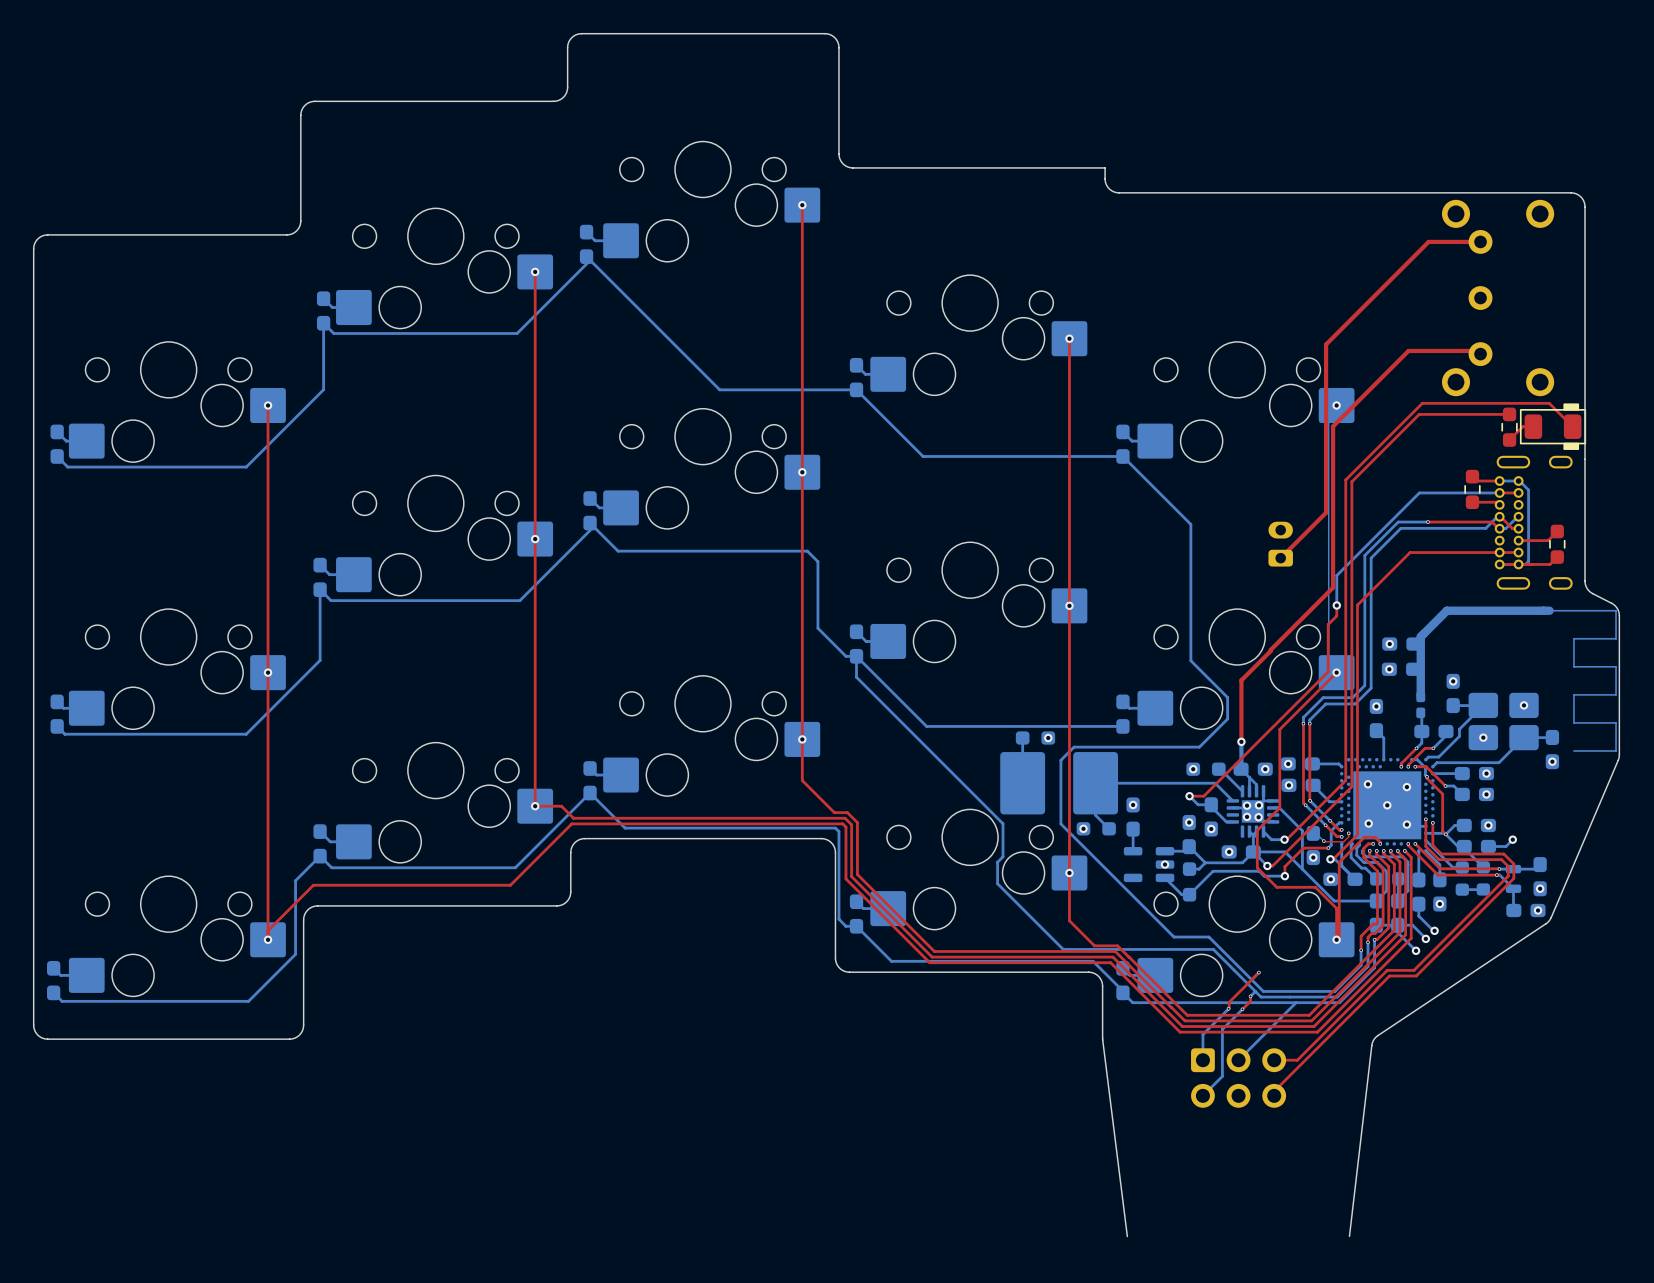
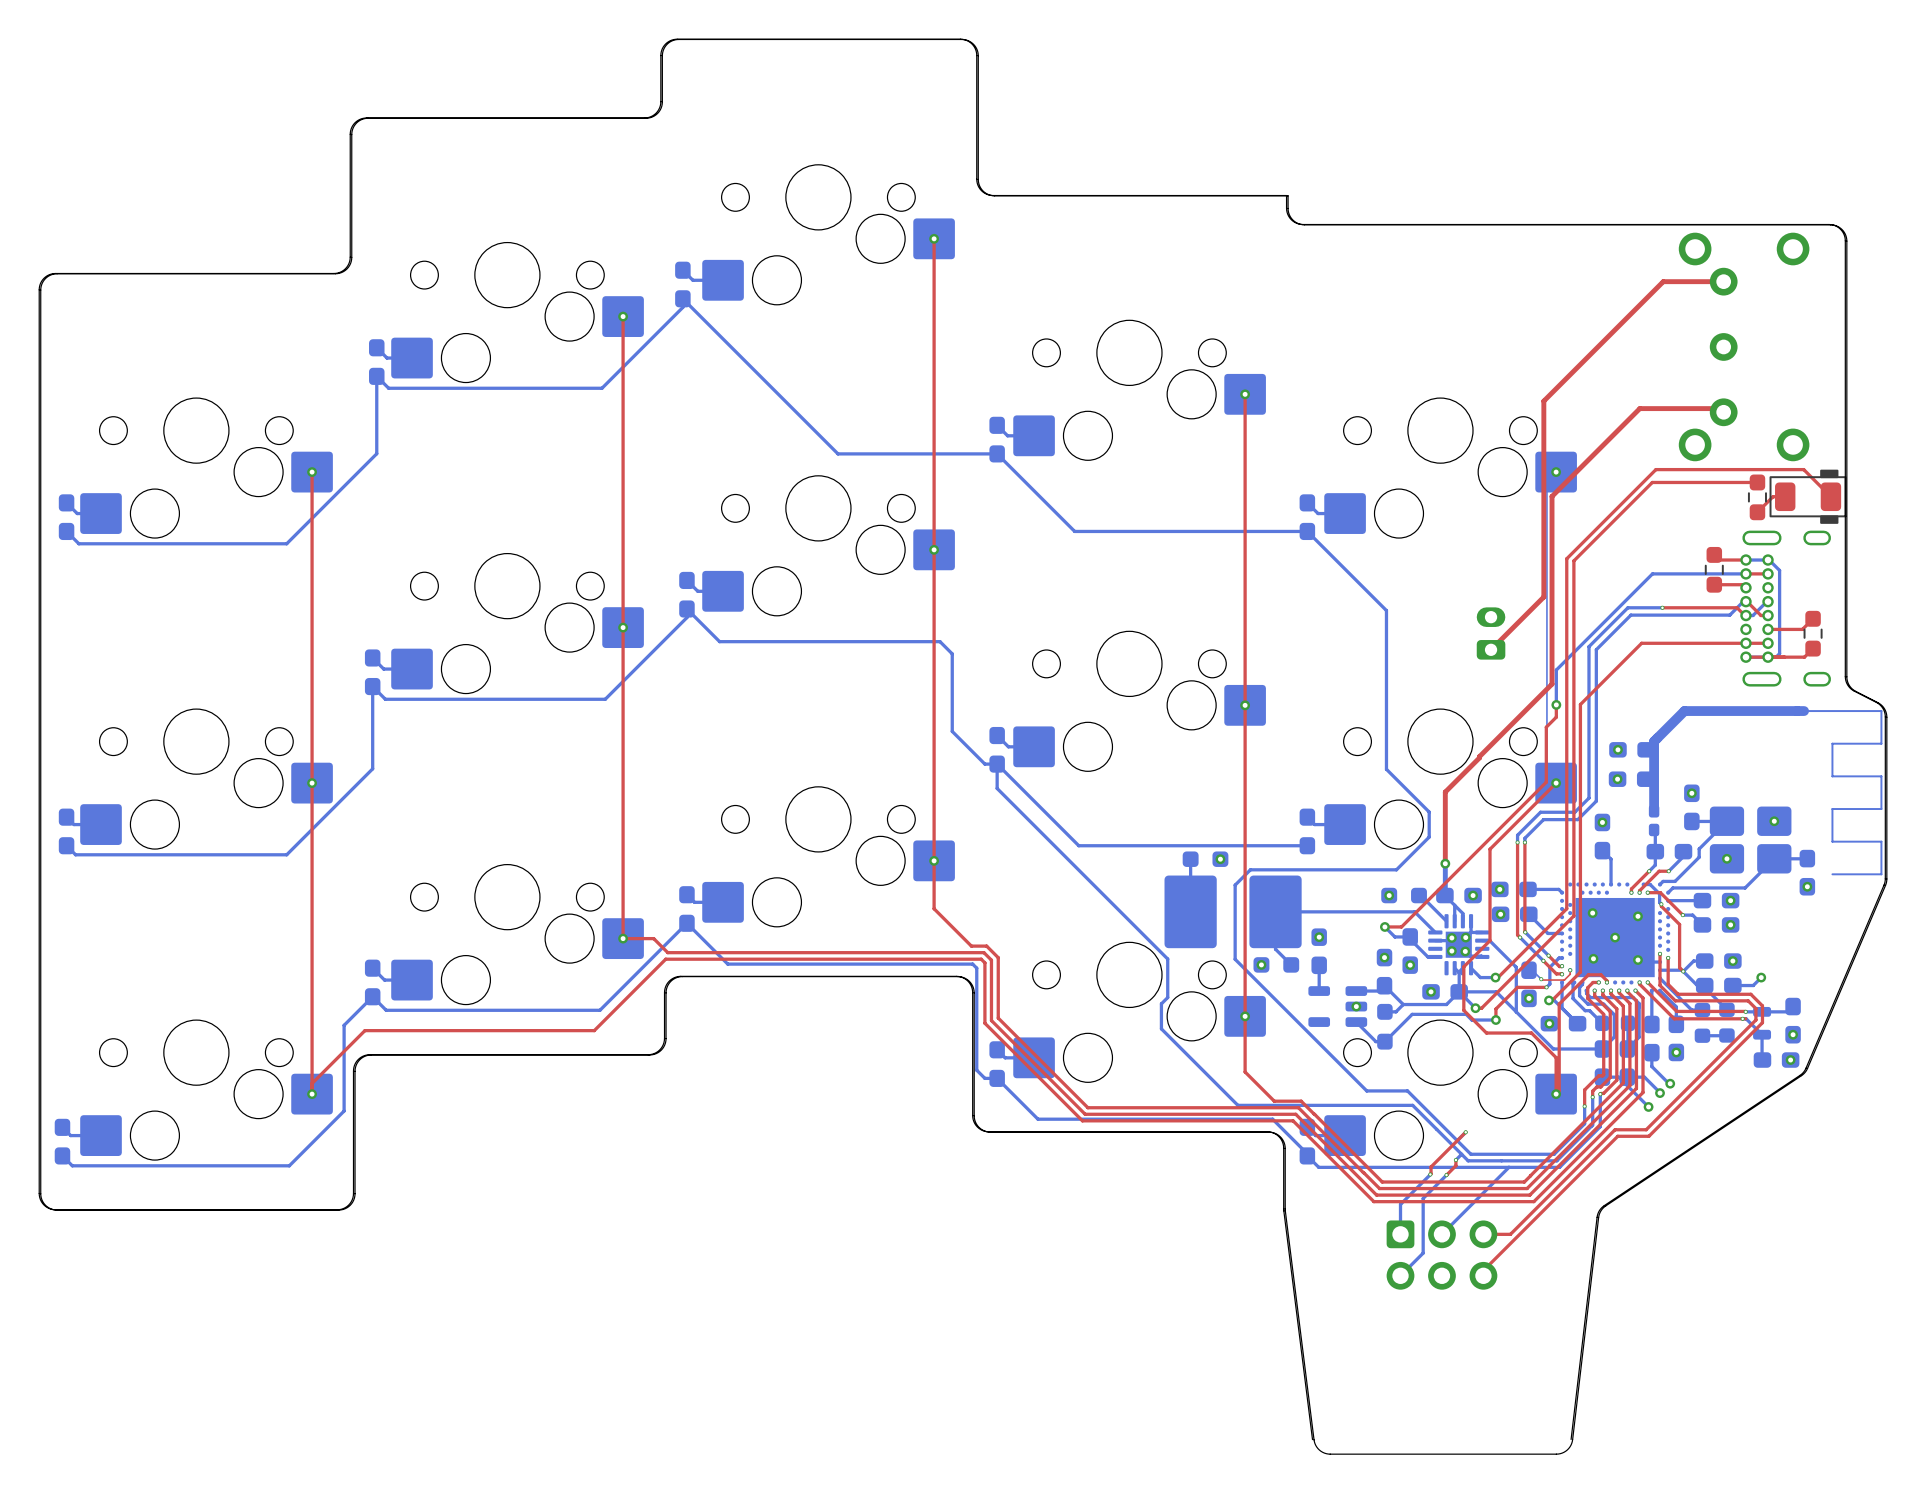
board edge: none -> (678, 39) (961, 39) (969, 41) (974, 45) (978, 53) (978, 181) (983, 191) (992, 195) (1288, 195) (1290, 216) (1296, 222) (1304, 224) (1830, 224) (1839, 227) (1844, 232) (1846, 241) (1846, 678) (1852, 689) (1879, 703) (1886, 713) (1886, 882) (1805, 1072) (1600, 1210) (1572, 1439) (1565, 1451) (1556, 1454) (1330, 1454) (1319, 1450) (1314, 1439) (1285, 1211) (1285, 1148) (1281, 1138) (1275, 1133) (1268, 1132) (990, 1132) (982, 1129) (976, 1123) (974, 1115) (974, 991) (969, 981) (959, 976) (680, 976) (672, 980) (666, 987) (665, 1040) (662, 1048) (653, 1054) (365, 1055) (358, 1061) (355, 1069) (354, 1195) (350, 1205) (342, 1209) (57, 1210) (48, 1207) (42, 1201) (40, 1193) (40, 290) (42, 283) (48, 276) (57, 273) (341, 272) (348, 267) (351, 259) (351, 134) (353, 127) (359, 120) (368, 118) (650, 117) (657, 113) (662, 104) (663, 50) (670, 41) (678, 39)

